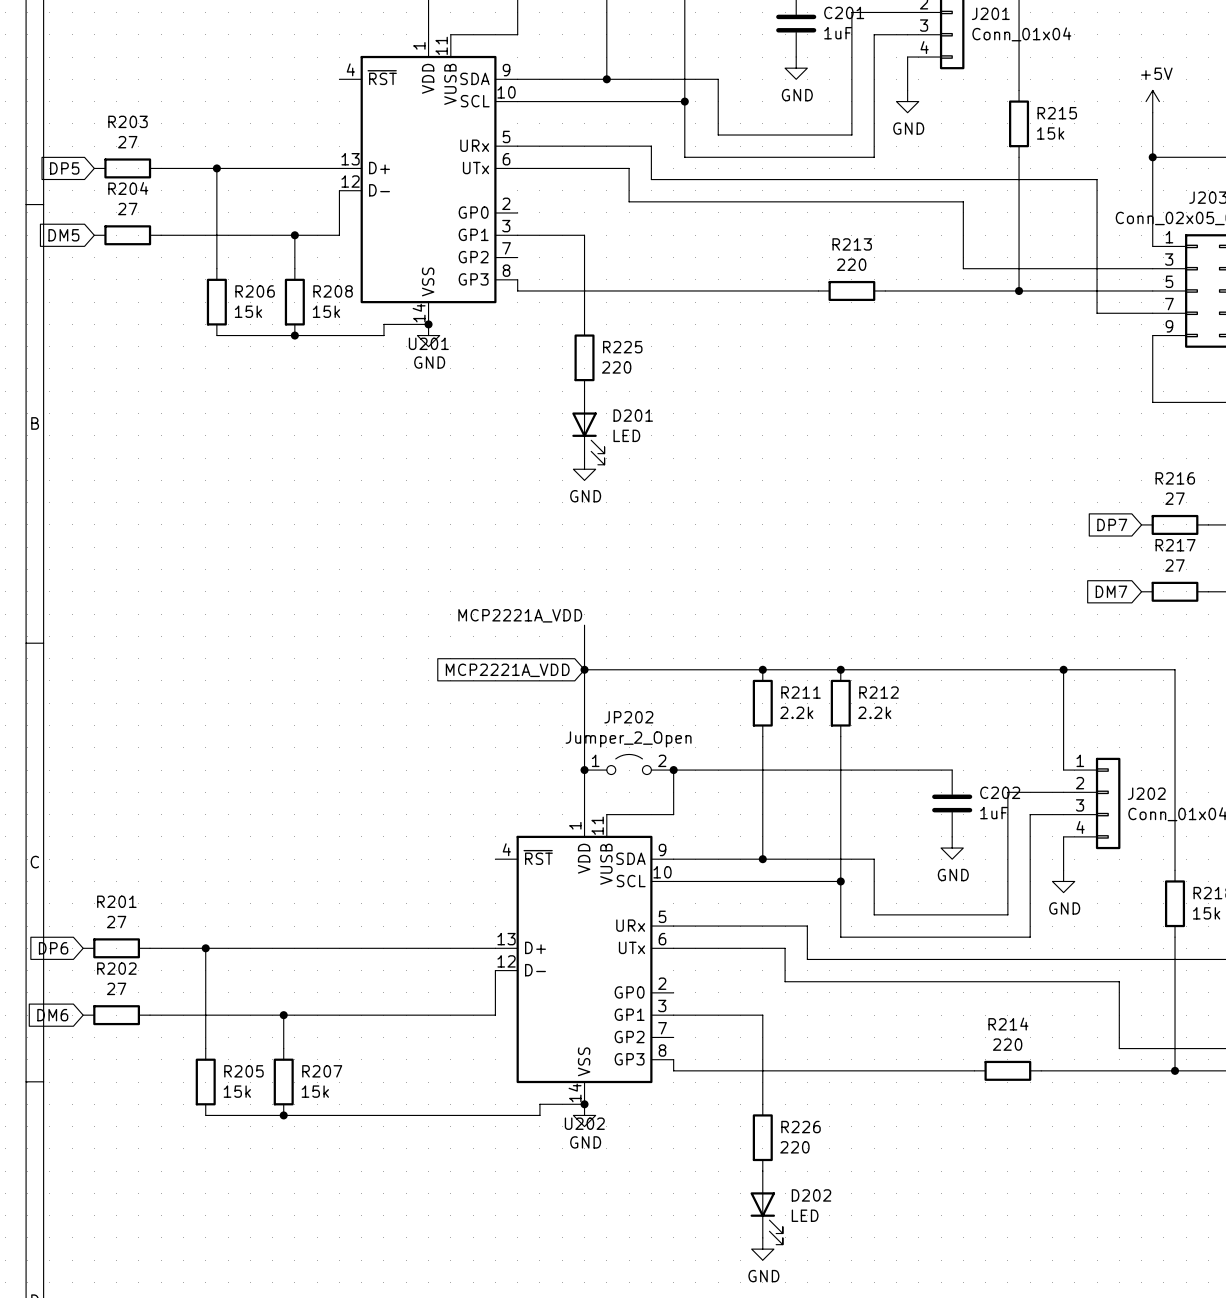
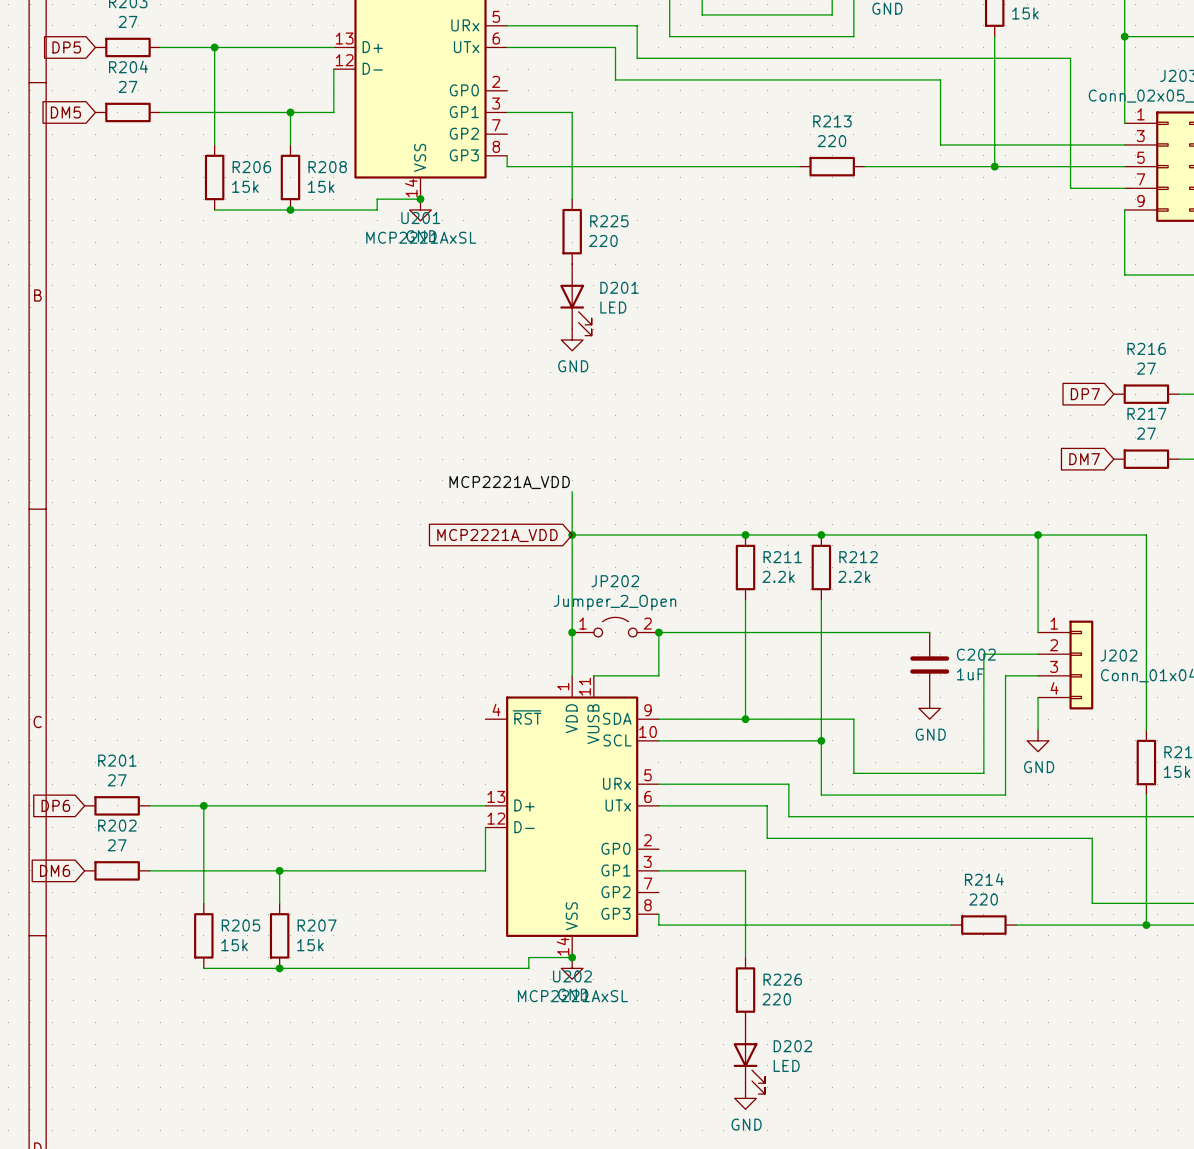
U201 value: none -> MCP2221AxSL (421, 237)
U202 value: none -> MCP2221AxSL (572, 996)

